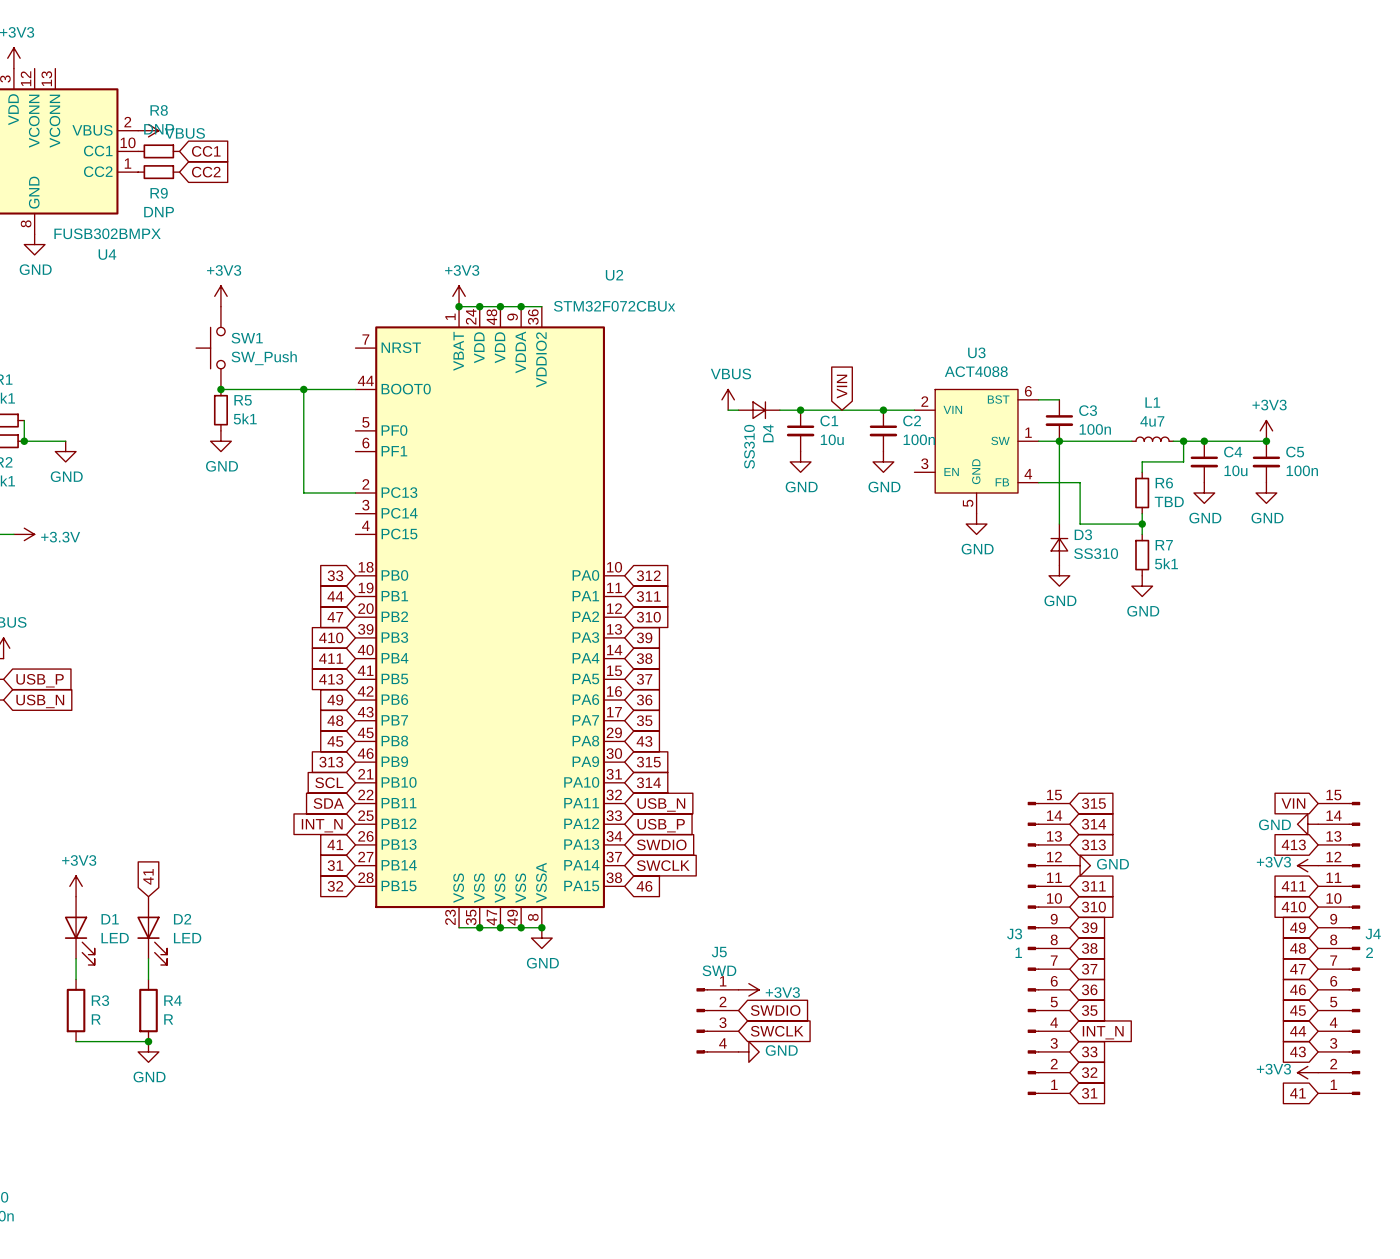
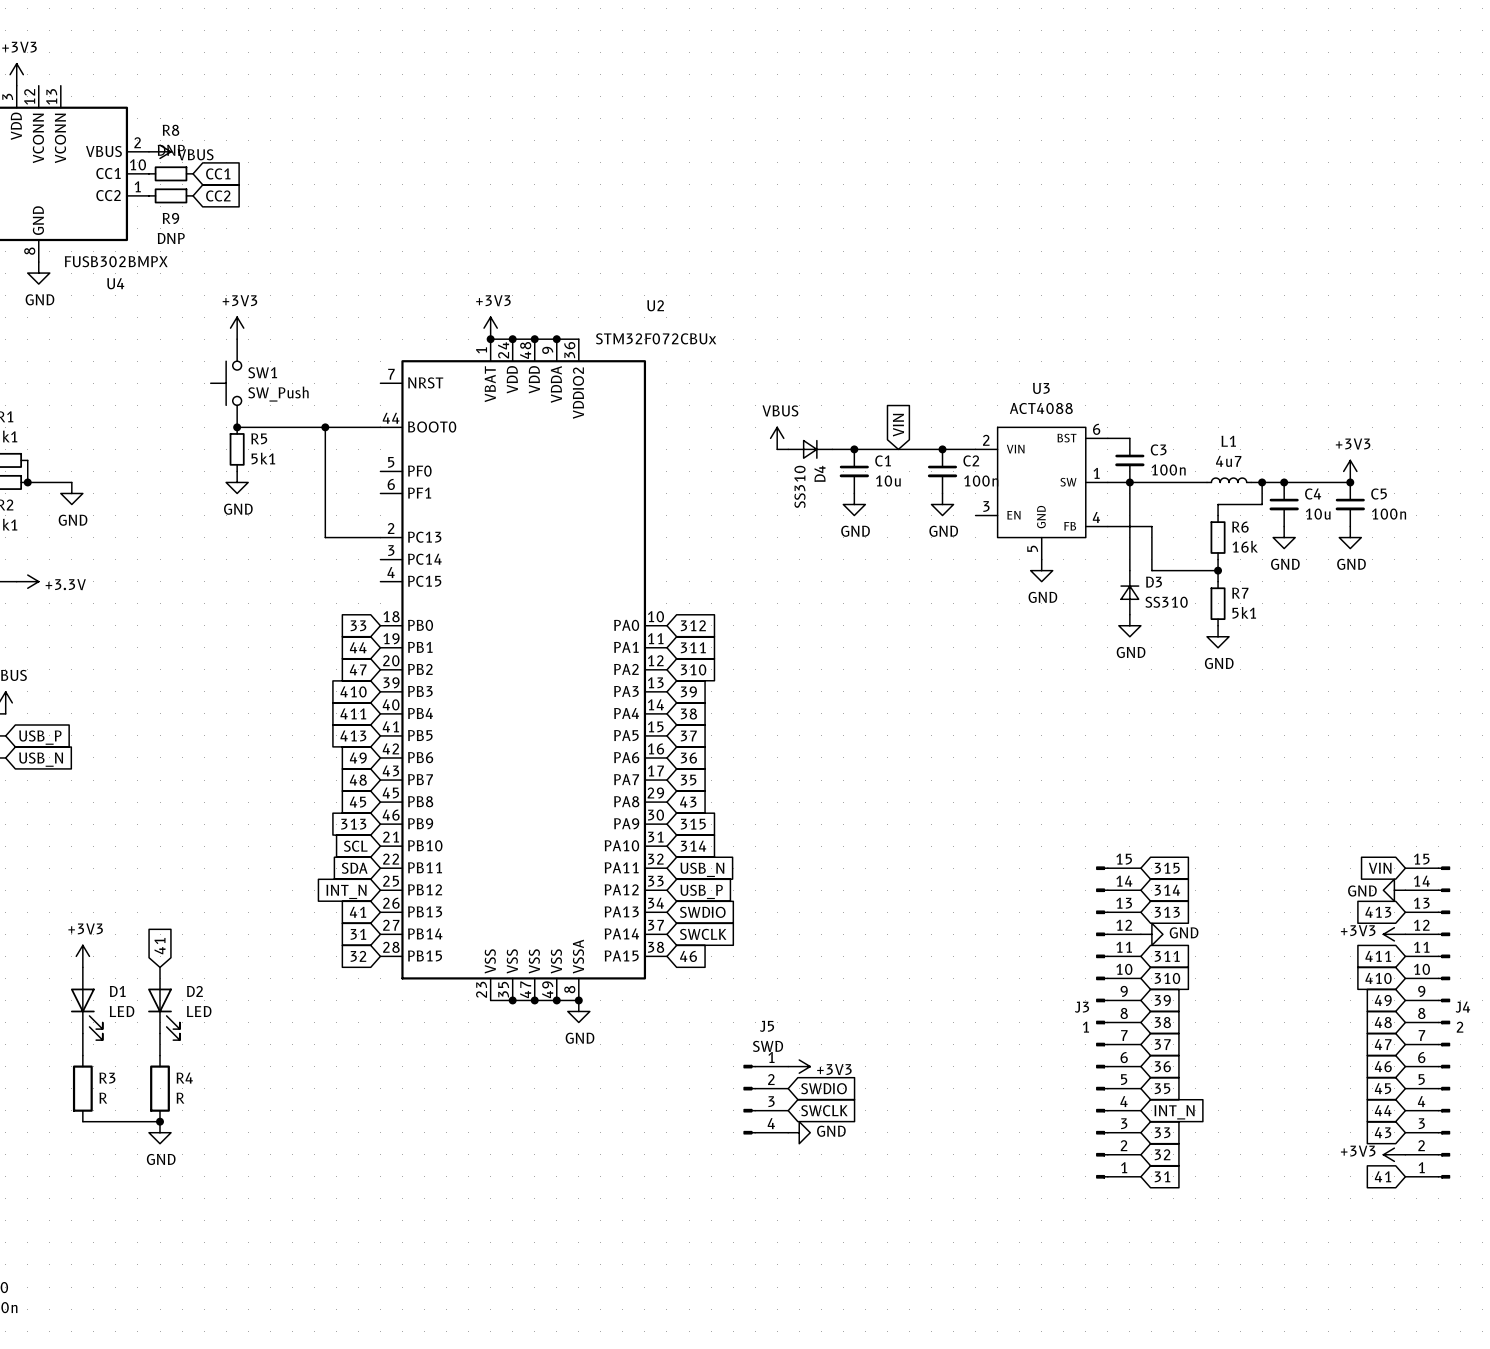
R6 value: TBD (1169, 501) -> 16k (1245, 546)

